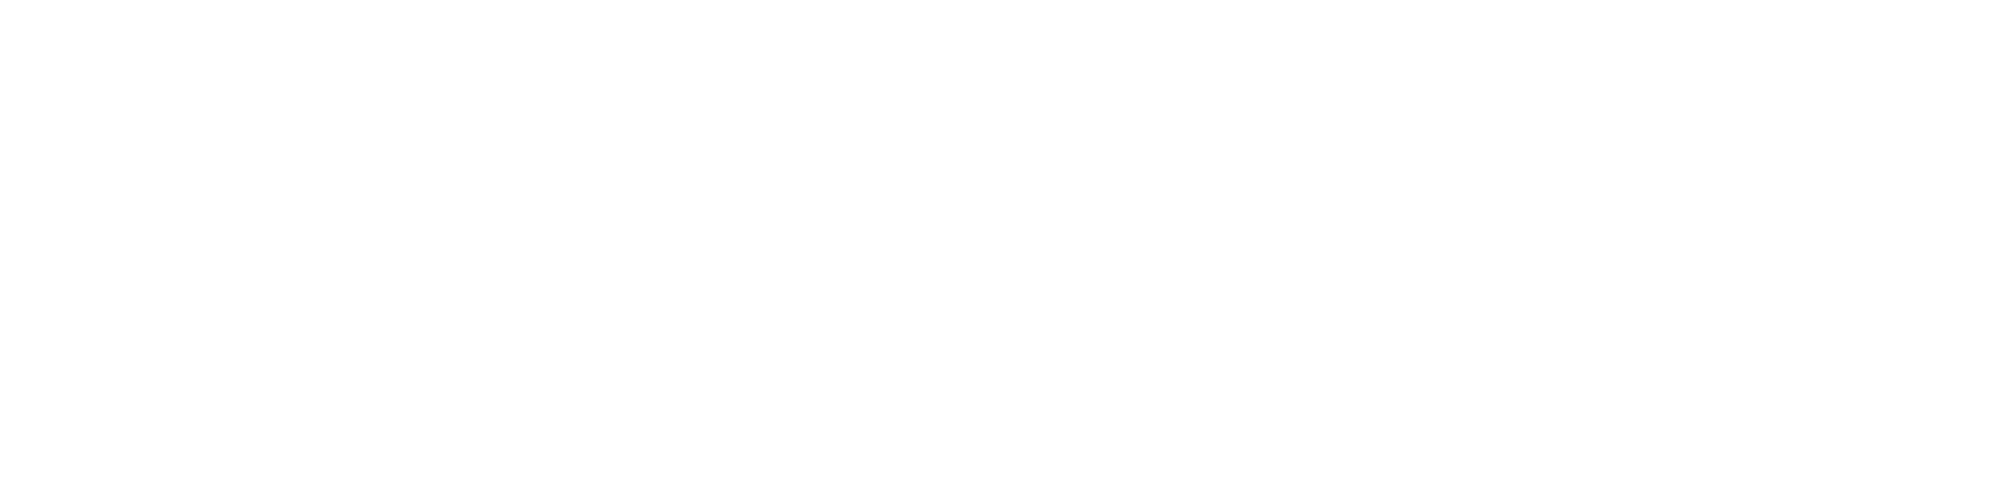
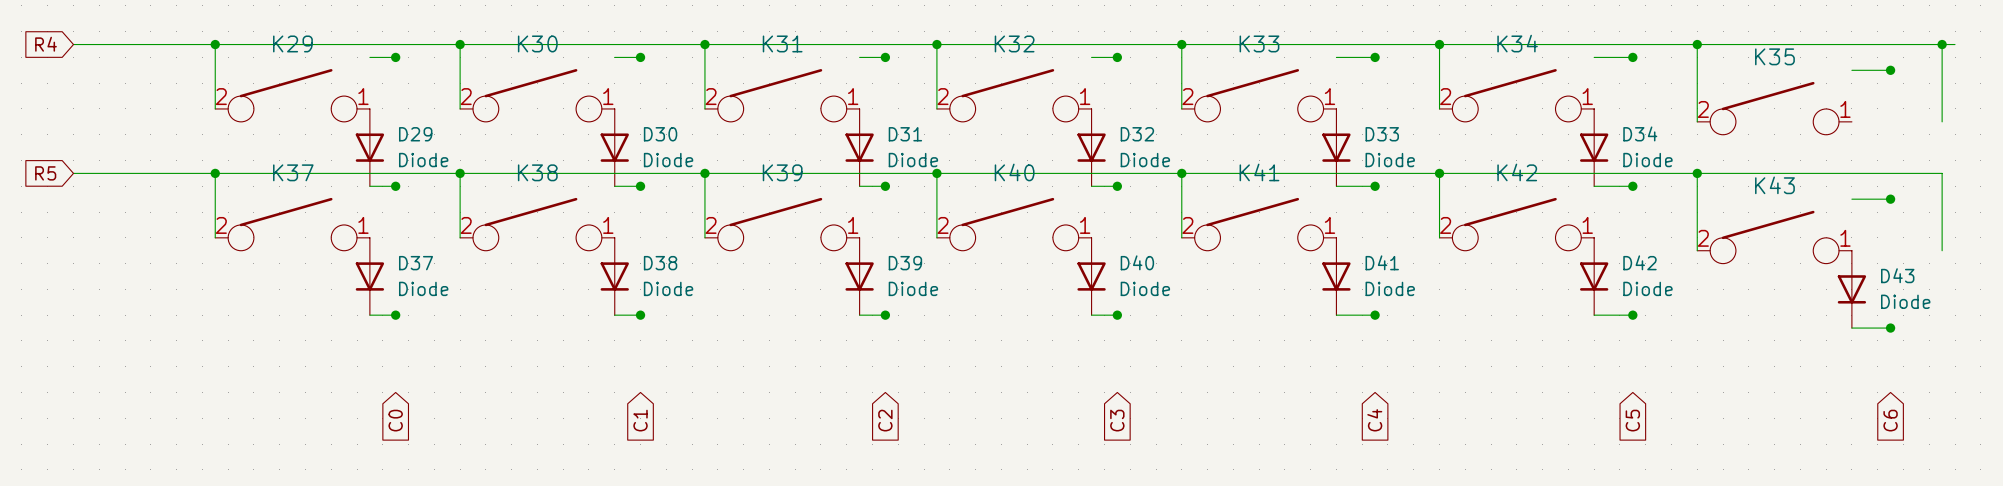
global label: none -> R4 (46, 44)
wire: none -> (73, 44) (1955, 44)
wire: none -> (215, 44) (215, 108)
junction: none -> (215, 44)
wire: none -> (460, 44) (460, 108)
junction: none -> (460, 44)
wire: none -> (704, 44) (704, 108)
junction: none -> (704, 44)
wire: none -> (936, 44) (936, 108)
junction: none -> (936, 44)
wire: none -> (1181, 44) (1181, 108)
junction: none -> (1181, 44)
wire: none -> (1439, 44) (1439, 108)
junction: none -> (1439, 44)
wire: none -> (1697, 44) (1697, 121)
junction: none -> (1697, 44)
wire: none -> (1942, 44) (1942, 121)
junction: none -> (1942, 44)
wire: none -> (369, 57) (395, 57)
junction: none -> (395, 57)
wire: none -> (614, 57) (640, 57)
junction: none -> (640, 57)
wire: none -> (859, 57) (885, 57)
junction: none -> (885, 57)
wire: none -> (1091, 57) (1117, 57)
junction: none -> (1117, 57)
wire: none -> (1336, 57) (1375, 57)
junction: none -> (1375, 57)
wire: none -> (1594, 57) (1632, 57)
junction: none -> (1632, 57)
wire: none -> (1851, 70) (1890, 70)
junction: none -> (1890, 70)
K29: none -> (292, 95)
K30: none -> (537, 95)
K31: none -> (782, 95)
K32: none -> (1014, 95)
K33: none -> (1259, 95)
K34: none -> (1516, 95)
K35: none -> (1774, 108)
D29: none -> Diode (369, 147)
D30: none -> Diode (614, 147)
D31: none -> Diode (859, 147)
D32: none -> Diode (1091, 147)
D33: none -> Diode (1336, 147)
D34: none -> Diode (1594, 147)
global label: none -> R5 (45, 173)
wire: none -> (73, 173) (1942, 173) (1942, 250)
wire: none -> (215, 173) (215, 237)
junction: none -> (215, 173)
wire: none -> (460, 173) (460, 237)
junction: none -> (460, 173)
wire: none -> (704, 173) (704, 237)
junction: none -> (704, 173)
wire: none -> (936, 173) (936, 237)
junction: none -> (936, 173)
wire: none -> (1181, 173) (1181, 237)
junction: none -> (1181, 173)
wire: none -> (1439, 173) (1439, 237)
junction: none -> (1439, 173)
wire: none -> (1697, 173) (1697, 250)
junction: none -> (1697, 173)
wire: none -> (369, 186) (395, 186)
junction: none -> (395, 186)
wire: none -> (614, 186) (640, 186)
junction: none -> (640, 186)
wire: none -> (859, 186) (885, 186)
junction: none -> (885, 186)
wire: none -> (1091, 186) (1117, 186)
junction: none -> (1117, 186)
wire: none -> (1336, 186) (1375, 186)
junction: none -> (1375, 186)
wire: none -> (1594, 186) (1632, 186)
junction: none -> (1632, 186)
wire: none -> (1851, 199) (1890, 199)
junction: none -> (1890, 199)
K37: none -> (292, 224)
K38: none -> (537, 224)
K39: none -> (782, 224)
K40: none -> (1014, 224)
K41: none -> (1259, 224)
K42: none -> (1516, 224)
K43: none -> (1774, 237)
D37: none -> Diode (369, 276)
D38: none -> Diode (614, 276)
D39: none -> Diode (859, 276)
D40: none -> Diode (1091, 276)
D41: none -> Diode (1336, 276)
D42: none -> Diode (1594, 276)
D43: none -> Diode (1851, 289)
wire: none -> (369, 315) (395, 315)
junction: none -> (395, 315)
wire: none -> (614, 315) (640, 315)
junction: none -> (640, 315)
wire: none -> (859, 315) (885, 315)
junction: none -> (885, 315)
wire: none -> (1091, 315) (1117, 315)
junction: none -> (1117, 315)
wire: none -> (1336, 315) (1375, 315)
junction: none -> (1375, 315)
wire: none -> (1594, 315) (1632, 315)
junction: none -> (1632, 315)
wire: none -> (1851, 328) (1890, 328)
junction: none -> (1890, 328)
global label: none -> C0 (395, 420)
global label: none -> C1 (640, 420)
global label: none -> C2 (885, 420)
global label: none -> C3 (1117, 420)
global label: none -> C4 (1374, 420)
global label: none -> C5 (1632, 420)
global label: none -> C6 (1890, 420)

